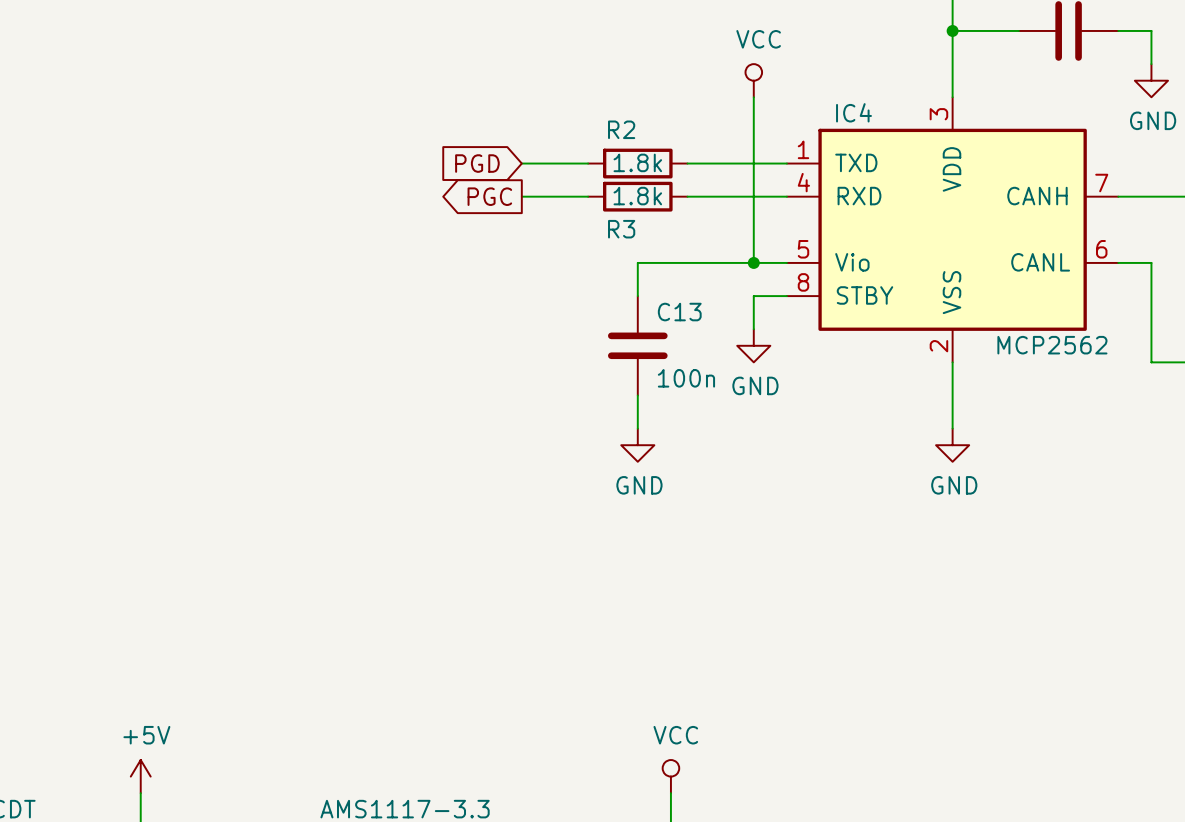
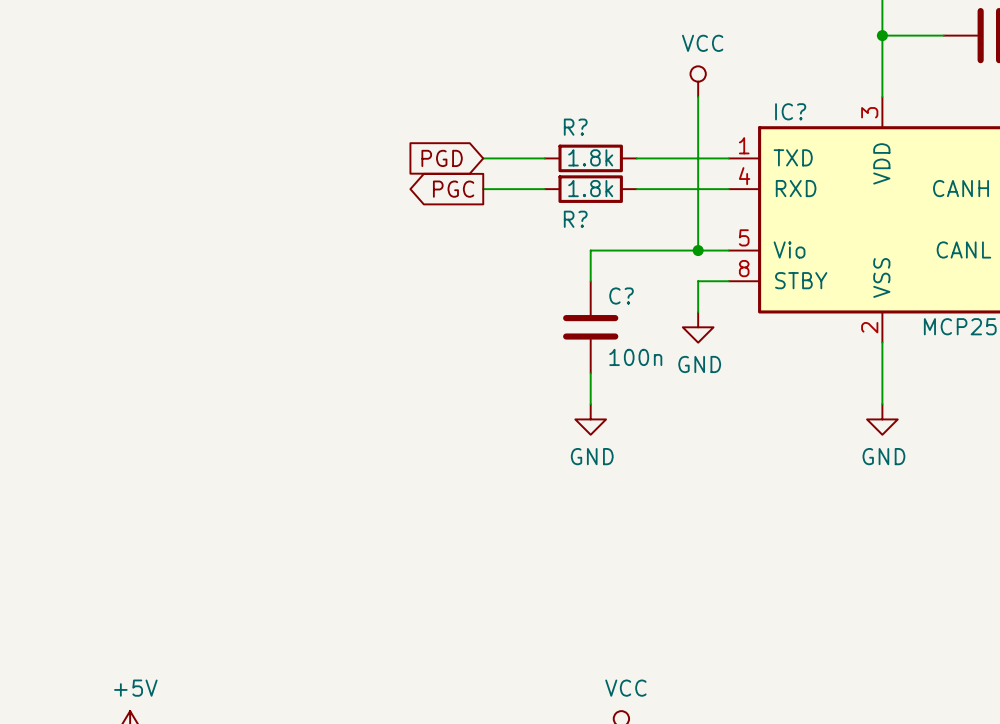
IC4 name: IC4 (853, 112) -> IC? (790, 111)
R2 name: R2 (621, 129) -> R? (575, 127)
R3 name: R3 (621, 229) -> R? (575, 219)
C13 name: C13 (679, 312) -> C? (621, 296)

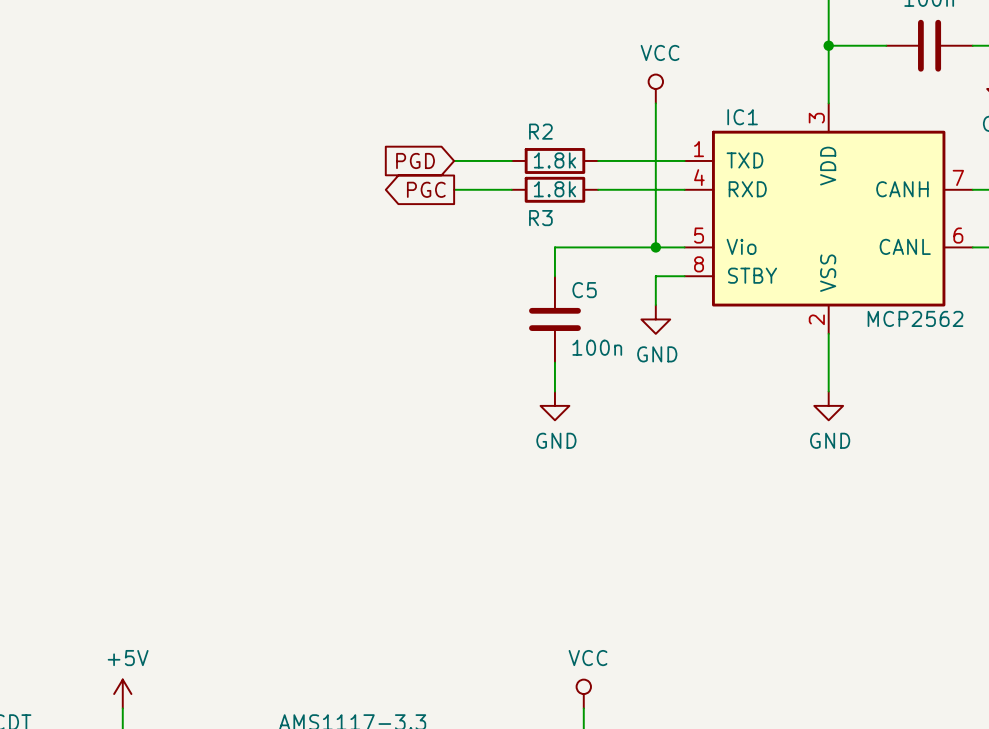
IC? name: IC? (790, 111) -> IC1 (742, 117)
R? name: R? (575, 127) -> R2 (540, 131)
R? name: R? (575, 219) -> R3 (540, 218)
C? name: C? (621, 296) -> C5 (584, 290)

